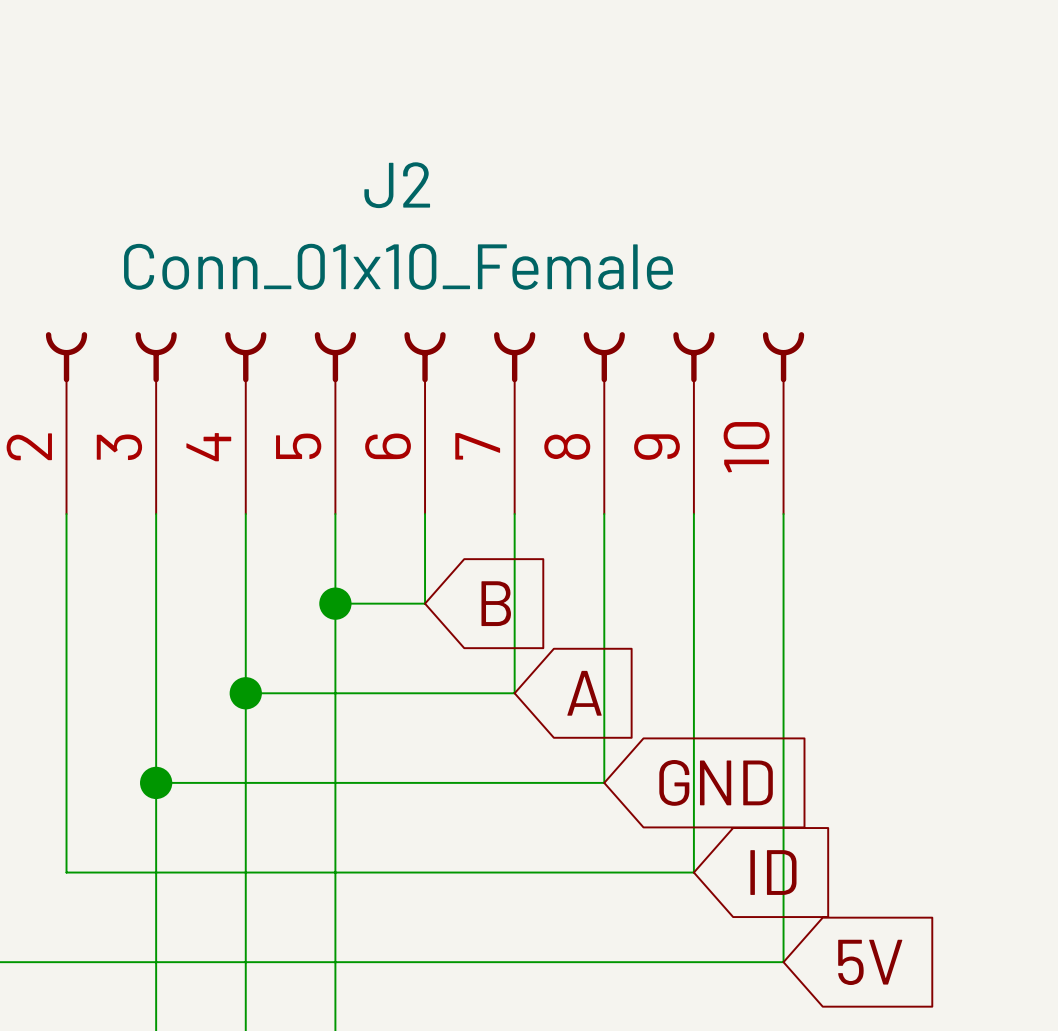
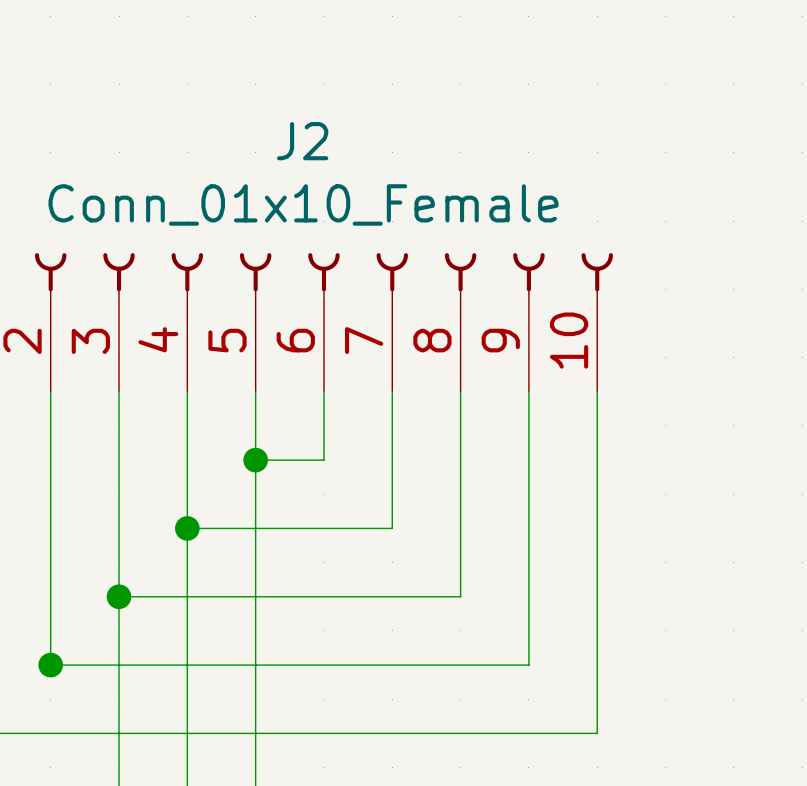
global label: B (496, 603) -> none
global label: A (584, 693) -> none
global label: GND (716, 782) -> none
junction: none -> (50, 665)
global label: ID (773, 872) -> none
global label: 5V (870, 962) -> none

